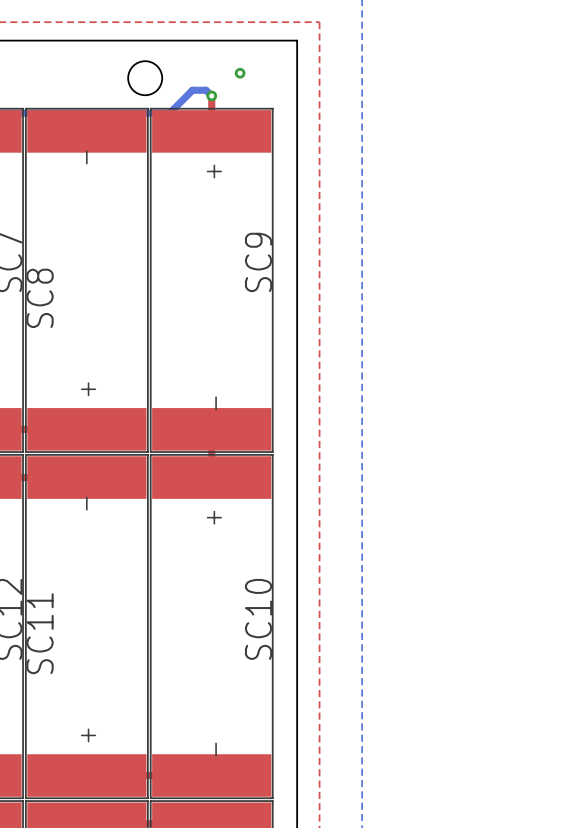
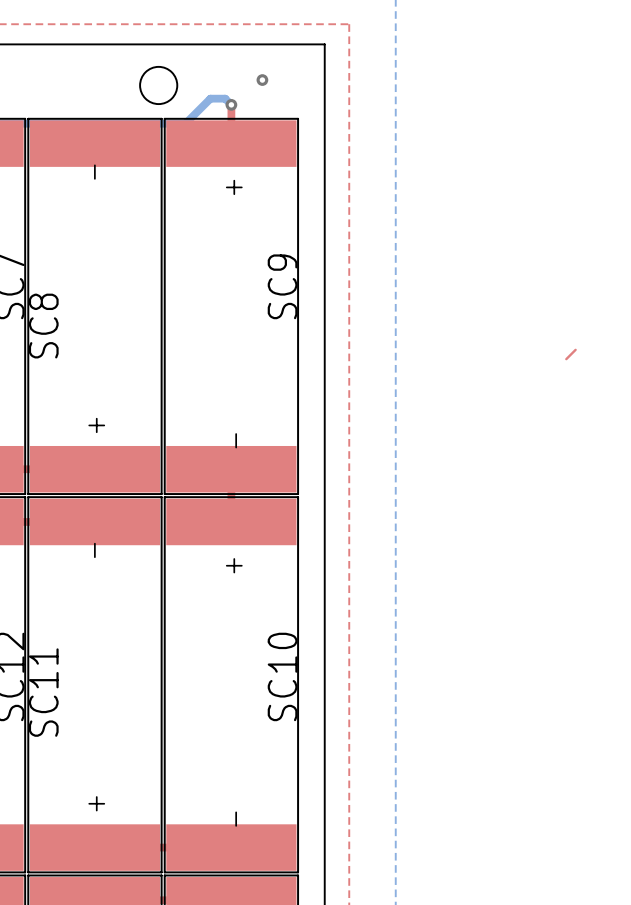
top track: none -> (575, 349) (566, 359)

